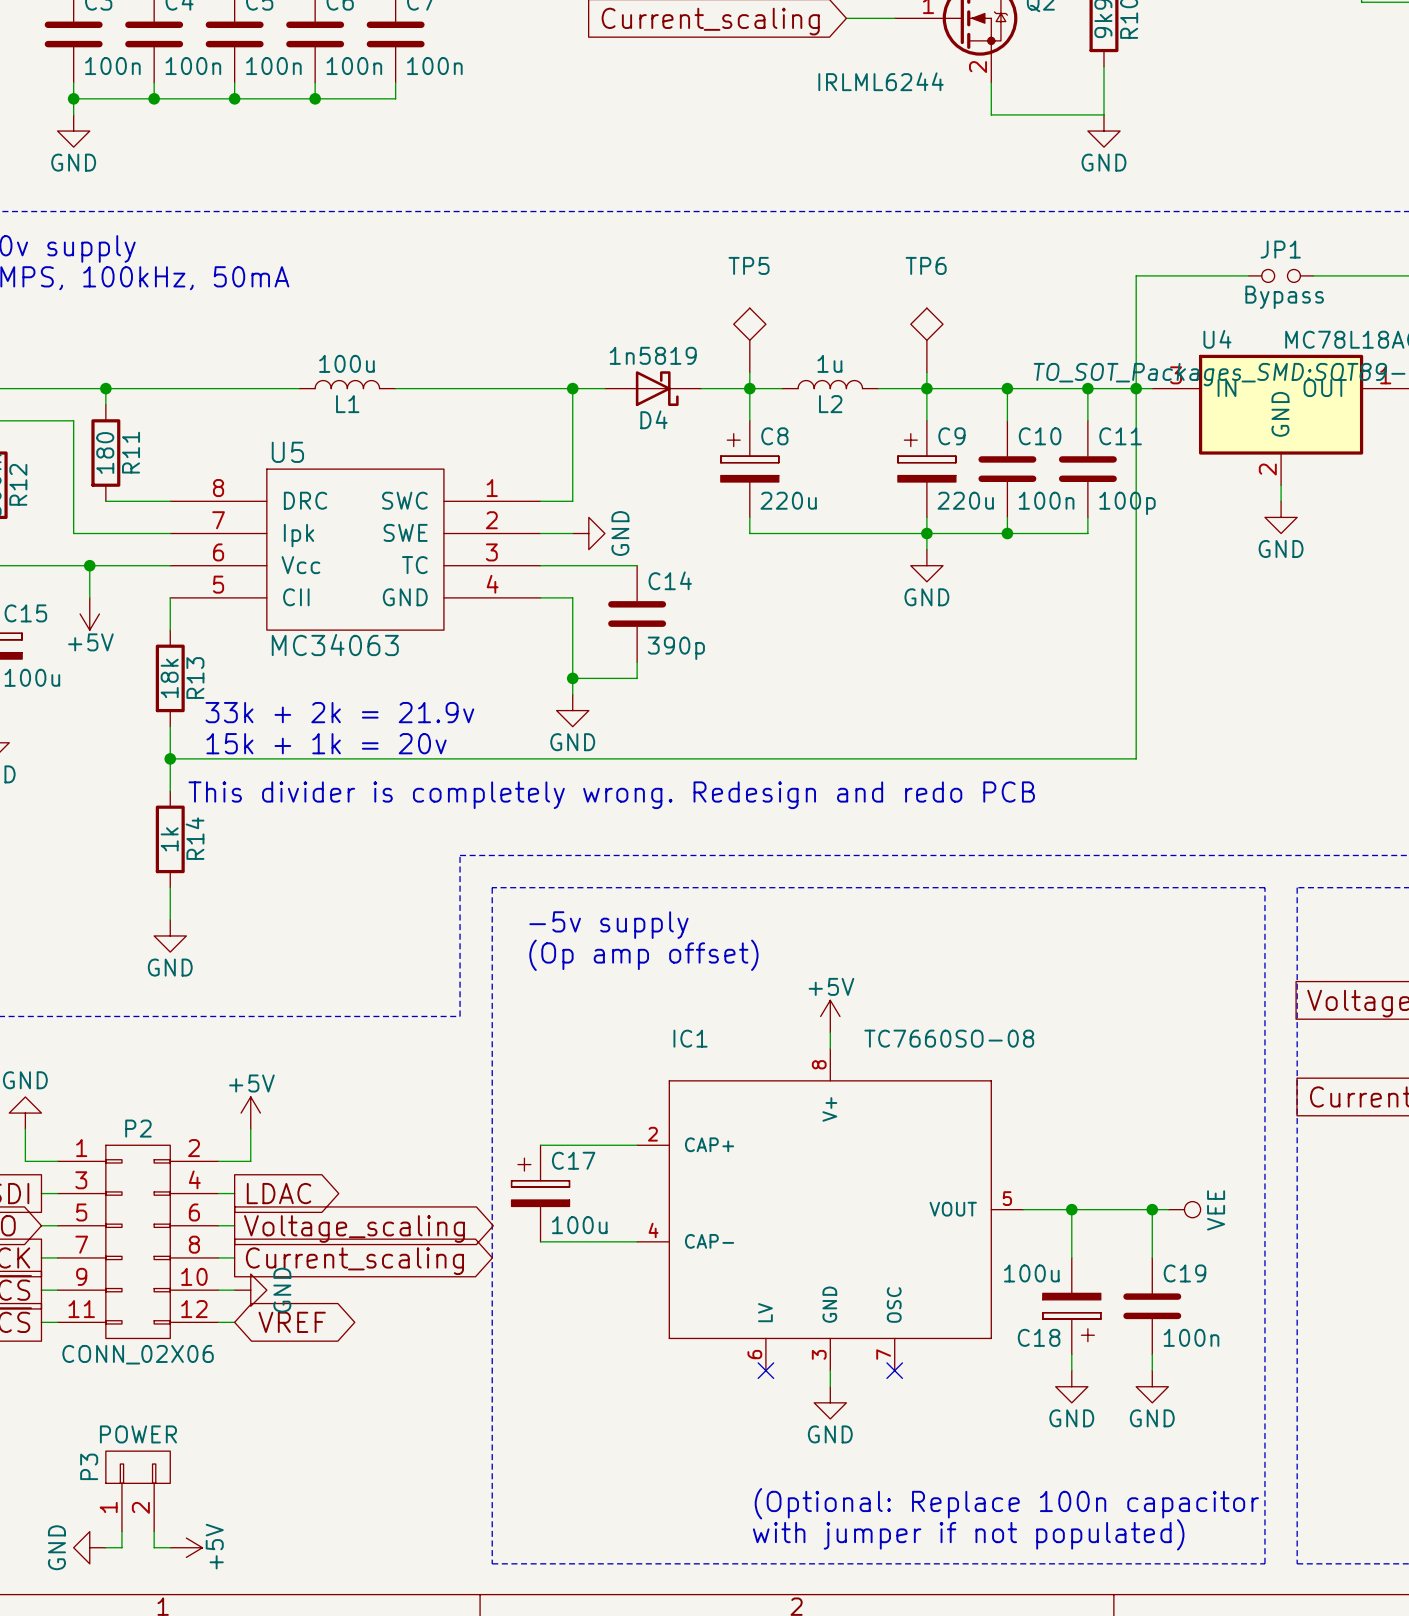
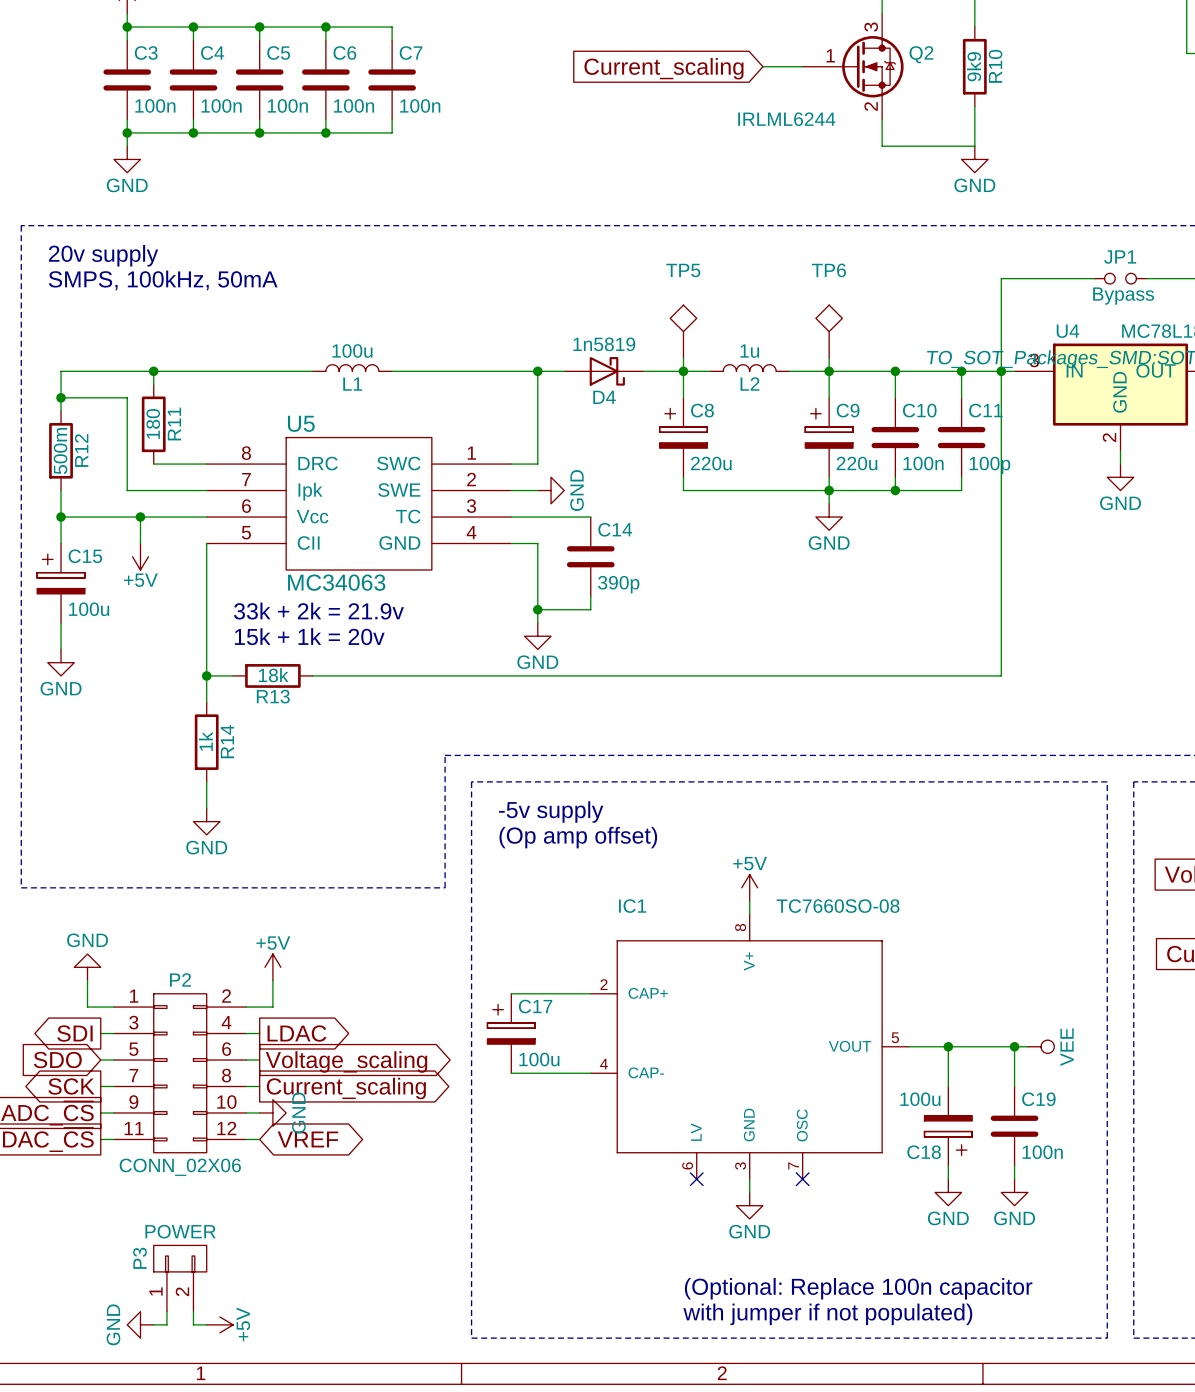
wire: none -> (206, 570) (206, 649)
R13 rotation: 0° (170, 678) -> 90° clockwise (272, 675)
R13 position: (170, 678) -> (272, 675)
text: none -> 33k + 2k = 21.9v (318, 611)
text: 33k + 2k = 21.9v (339, 712) -> 15k + 1k = 20v (309, 636)
text: 15k + 1k = 20v (326, 743) -> none
wire: (202, 758) (299, 758) -> none
text: This divider is completely wrong. Redesign and redo PCB (611, 795) -> none

